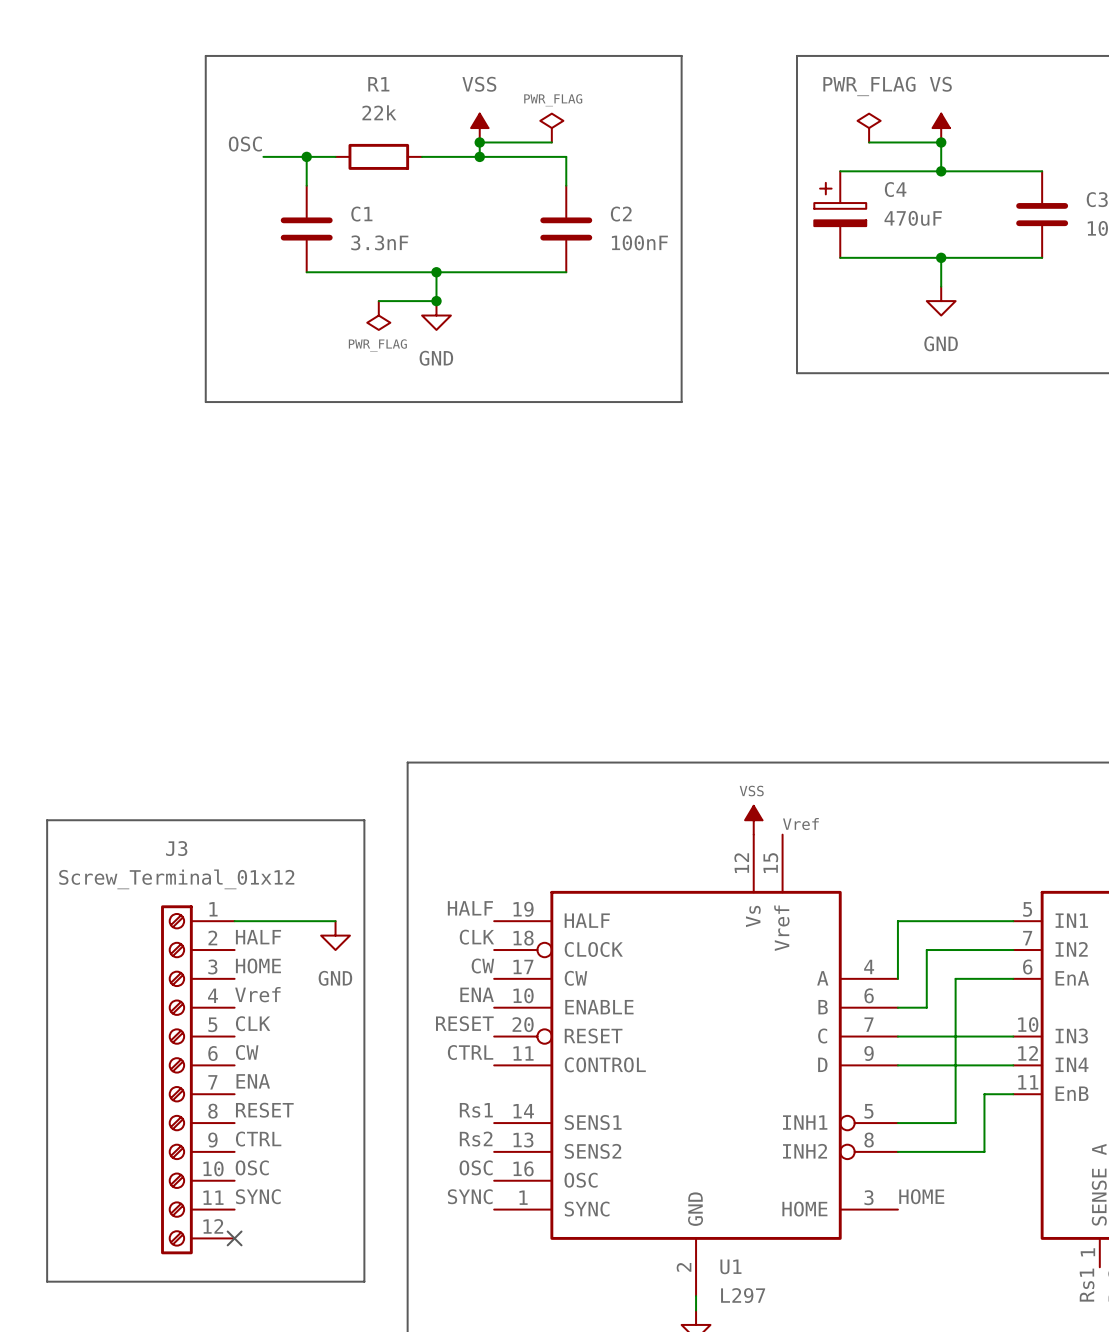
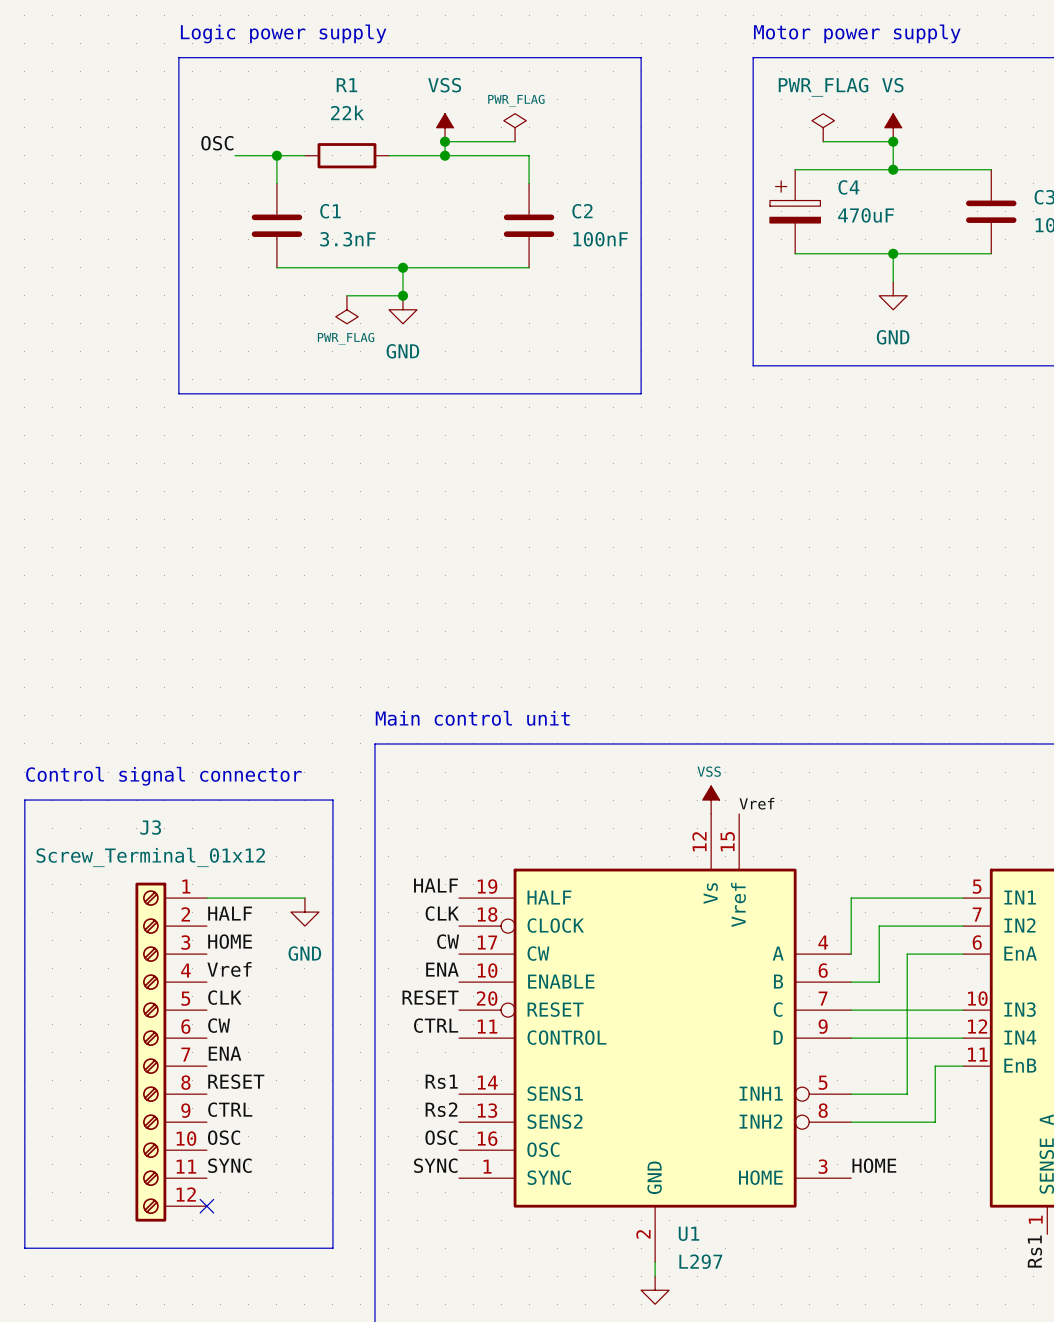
text: none -> Logic power supply (283, 33)
text: none -> Motor power supply (857, 33)
text: none -> Main control unit (472, 718)
text: none -> Control signal connector (163, 776)

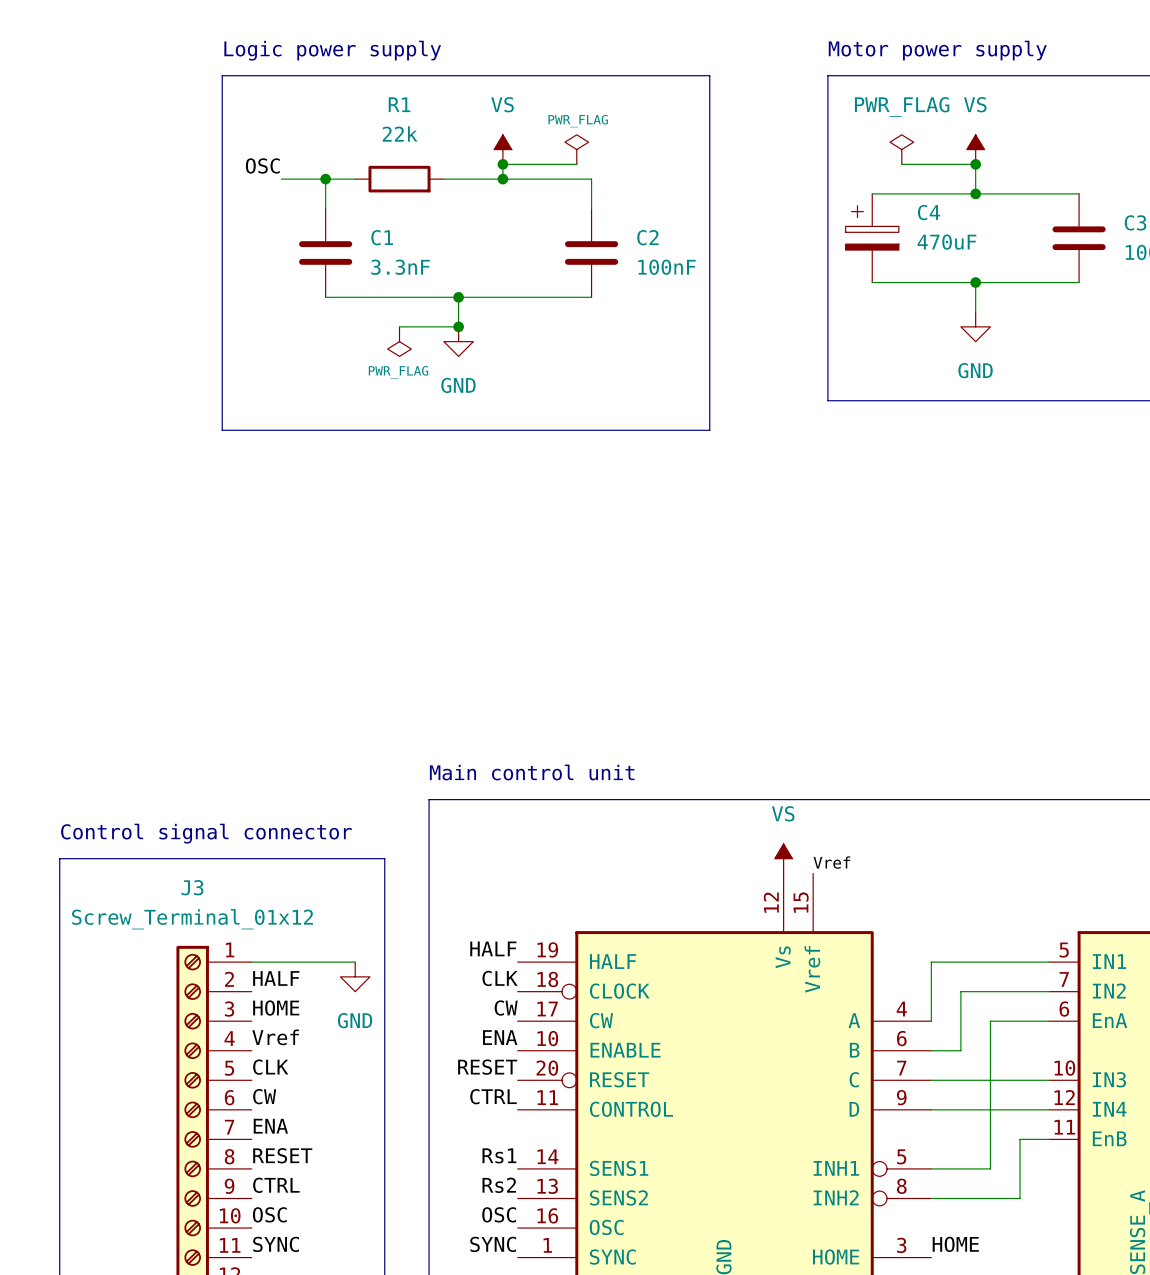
power symbol: VSS (445, 127) -> VS (502, 149)
power symbol: VSS (711, 800) -> VS (783, 858)

